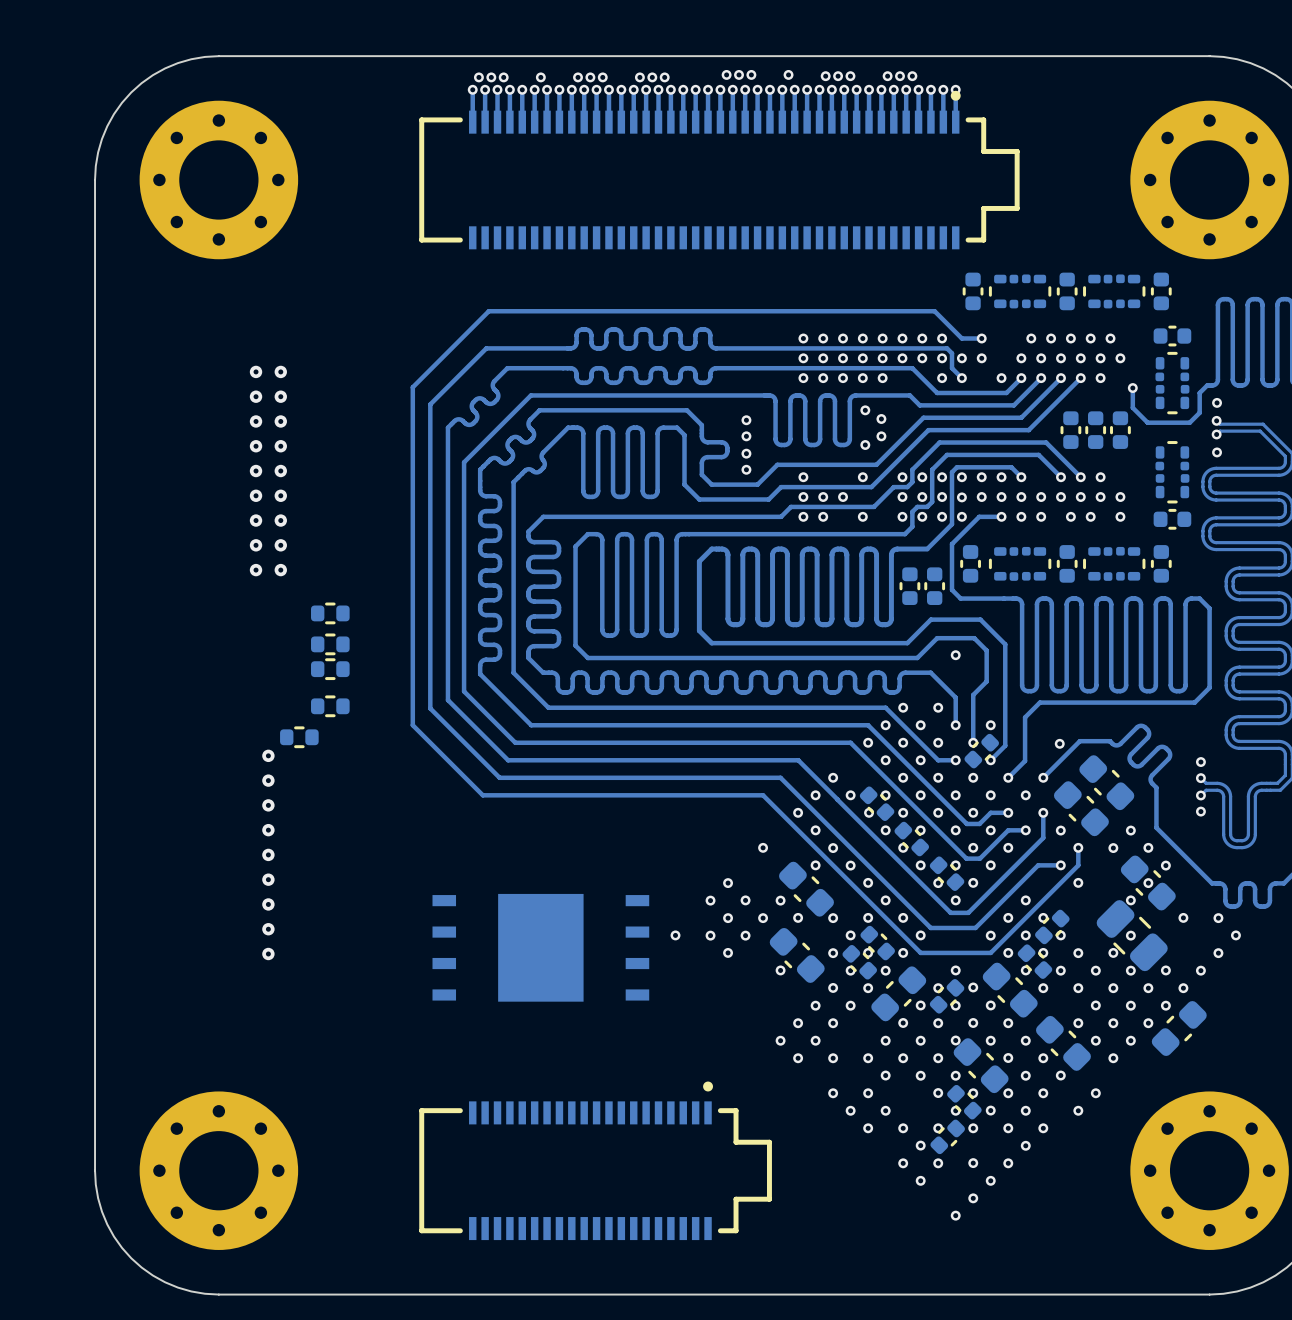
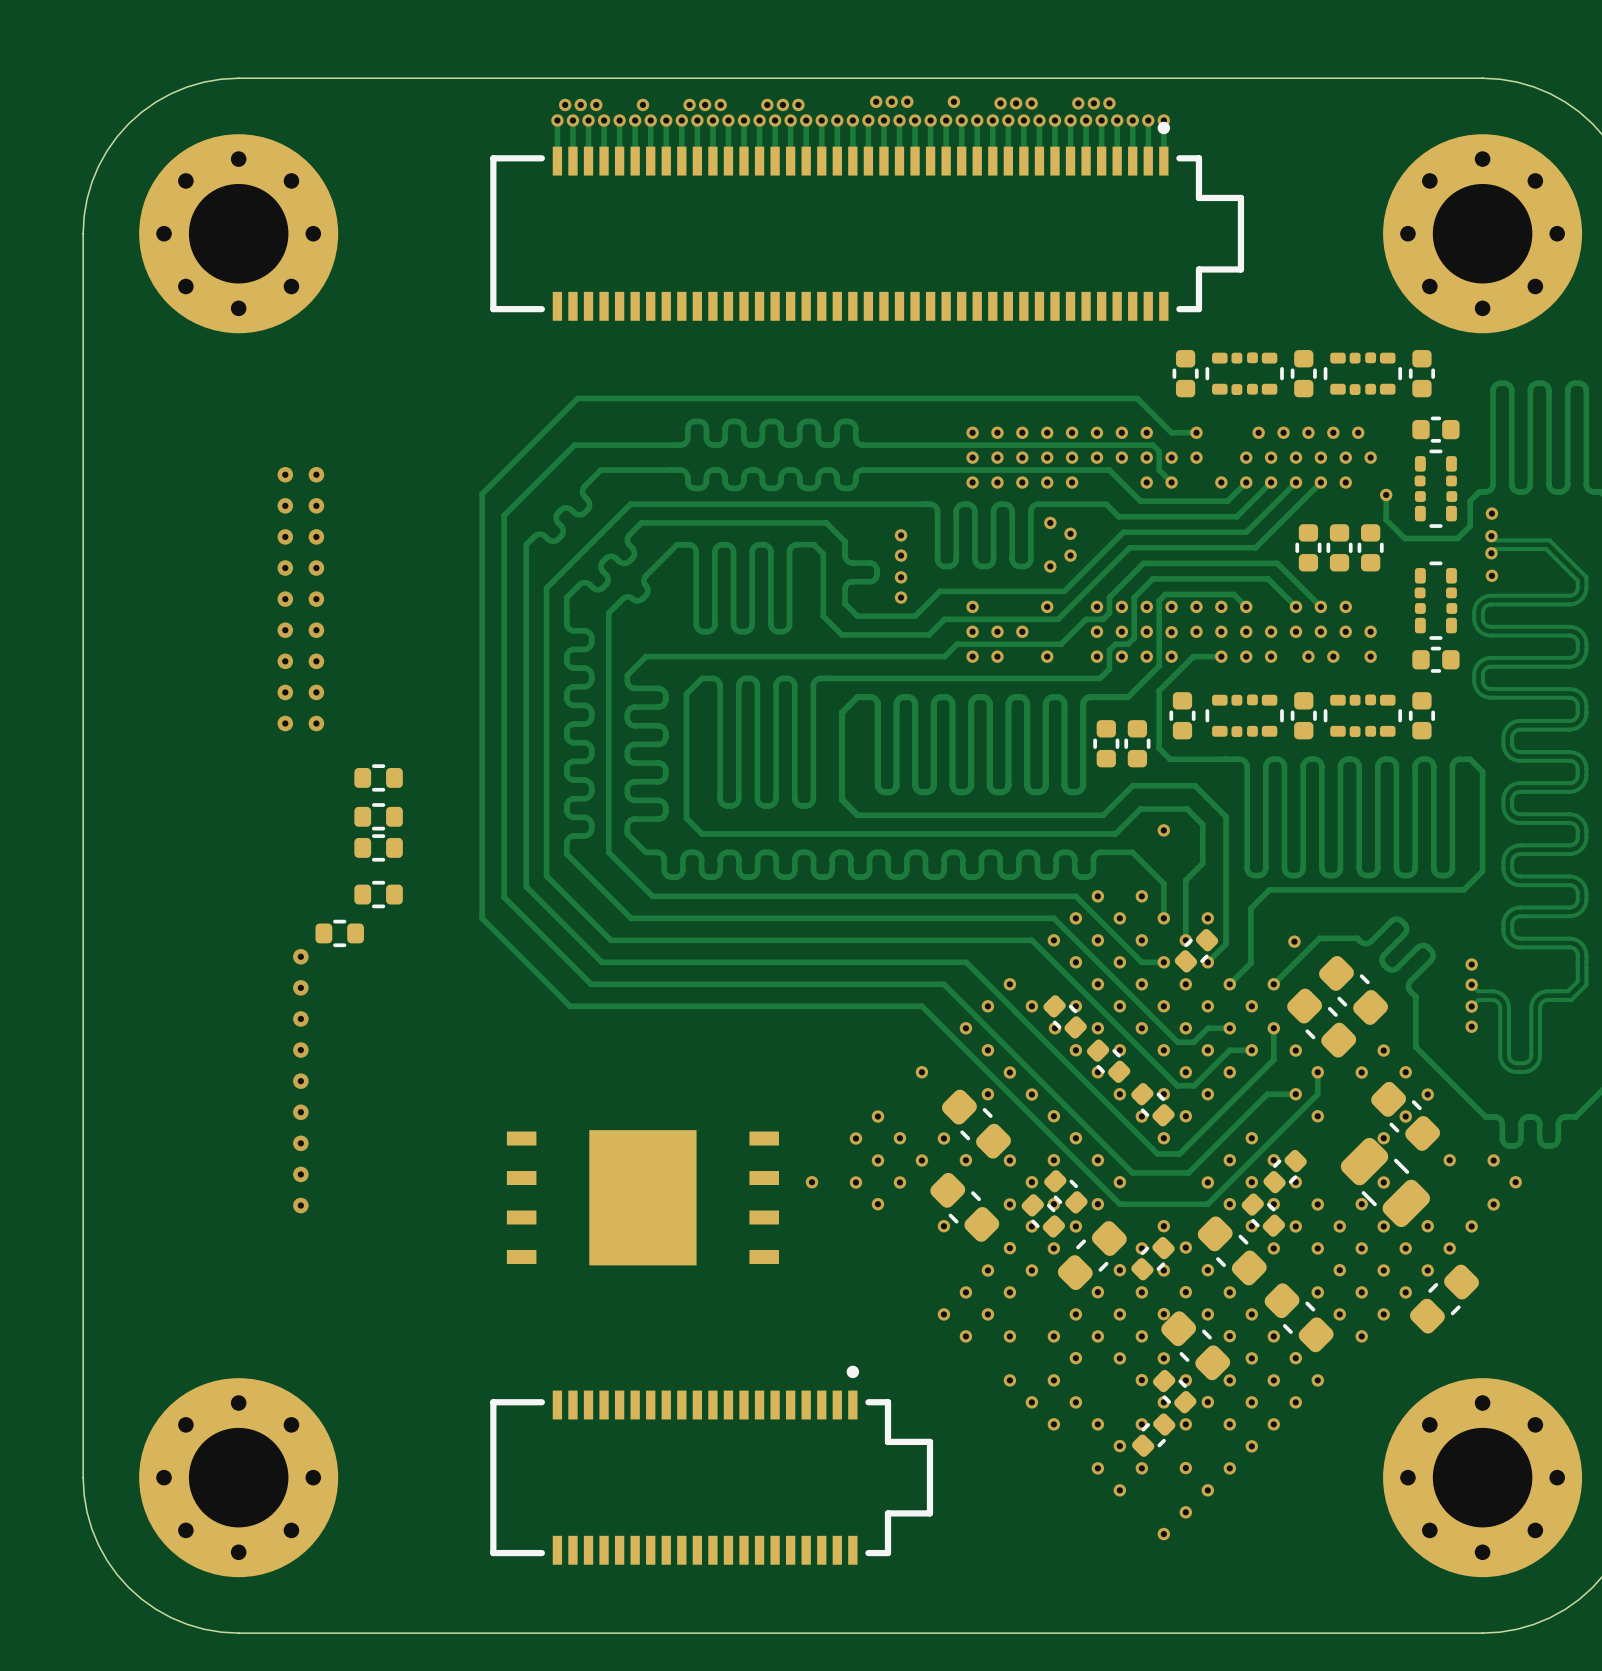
via: none -> (1317, 1380)
via: (1095, 1093) -> none
via: none -> (1295, 1402)
via: (1078, 1110) -> none

